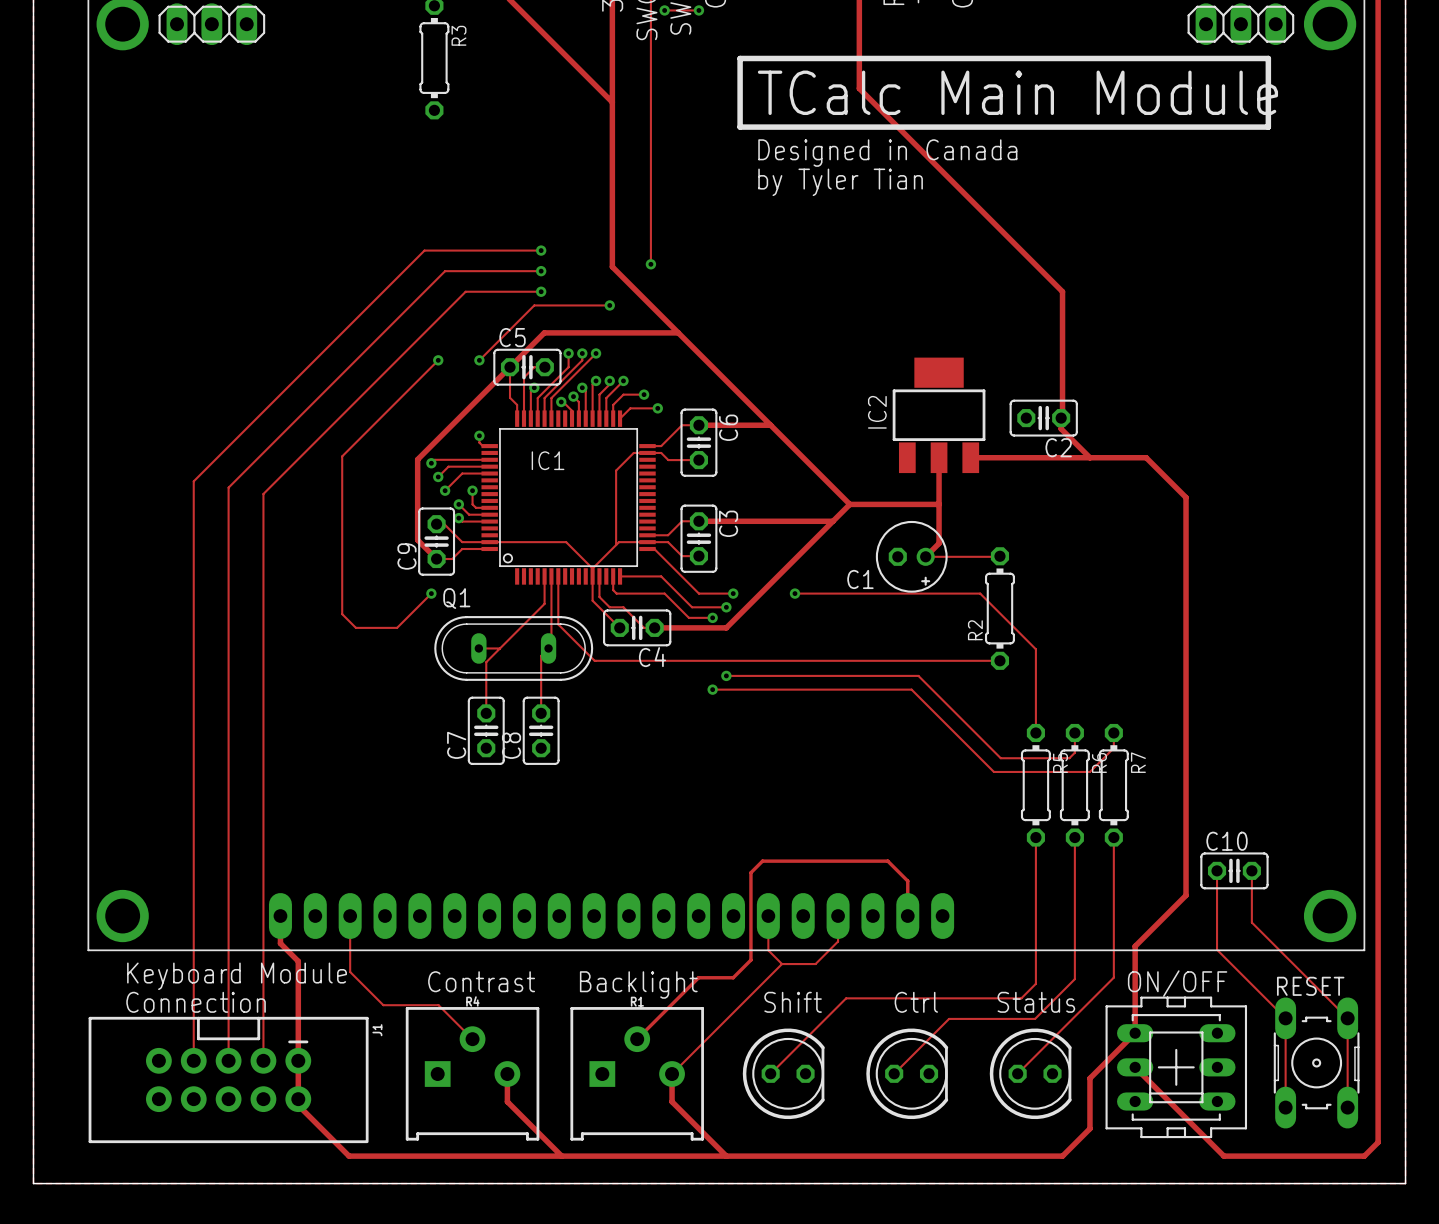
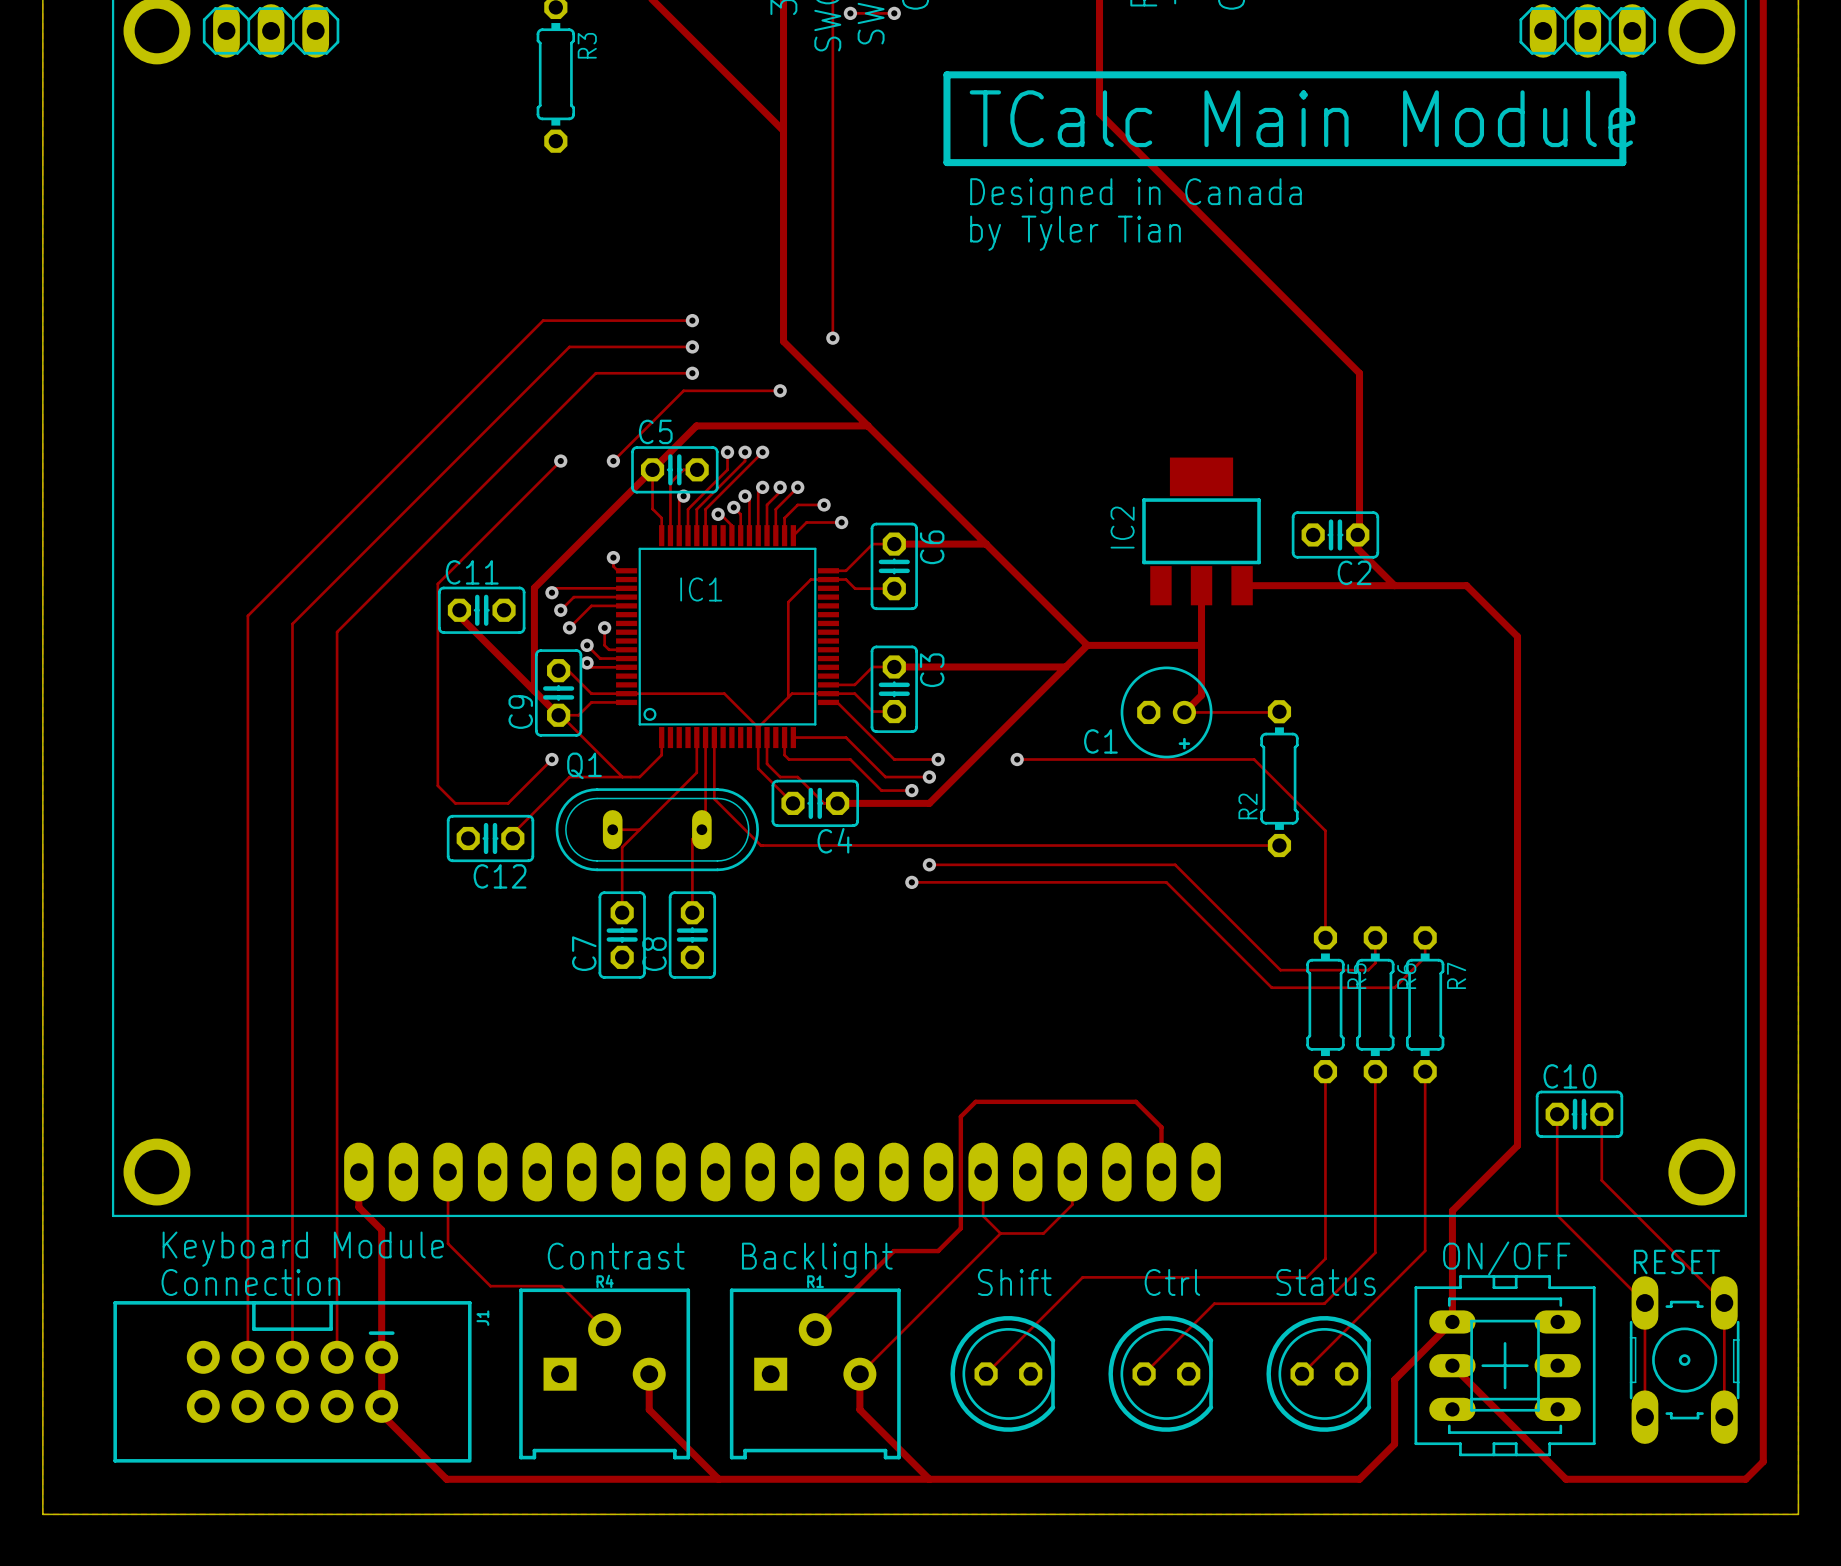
track: none -> (459, 610) (459, 616) (534, 691)
C11: none -> (481, 610)
track: none -> (560, 715) (622, 777)
track: none -> (661, 737) (661, 755) (639, 777) (569, 777) (512, 833) (512, 838)
C12: none -> (490, 838)

